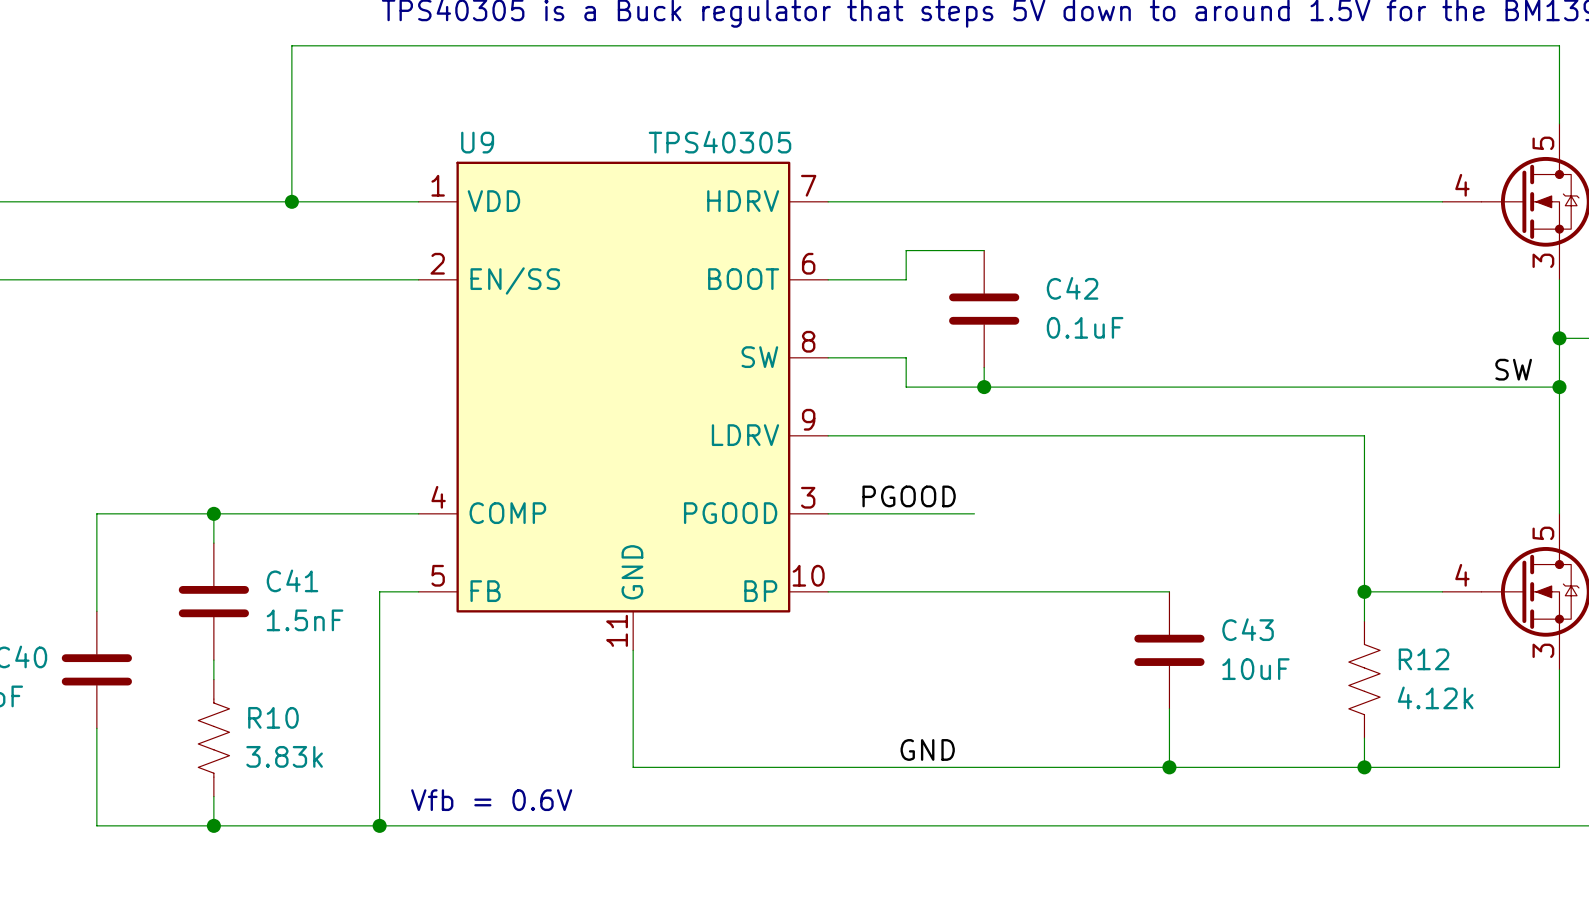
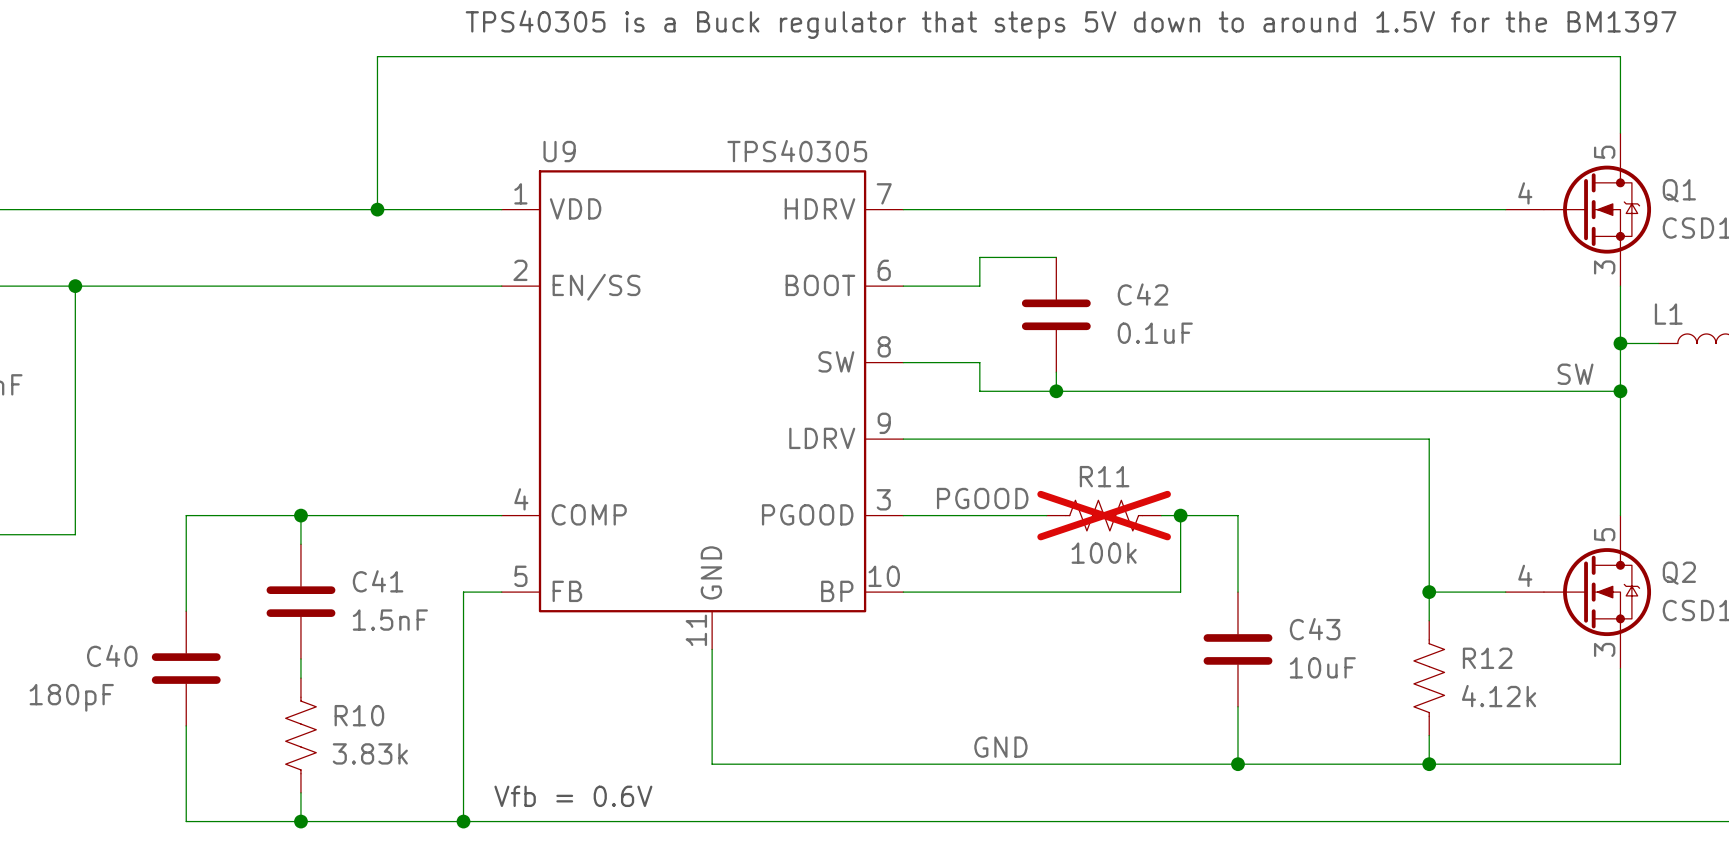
R11: none -> 100k (1104, 515)
wire: none -> (1180, 515) (1180, 592)
junction: none -> (1180, 515)
wire: (1110, 591) (1169, 591) -> (1161, 515) (1237, 515) (1237, 592)

